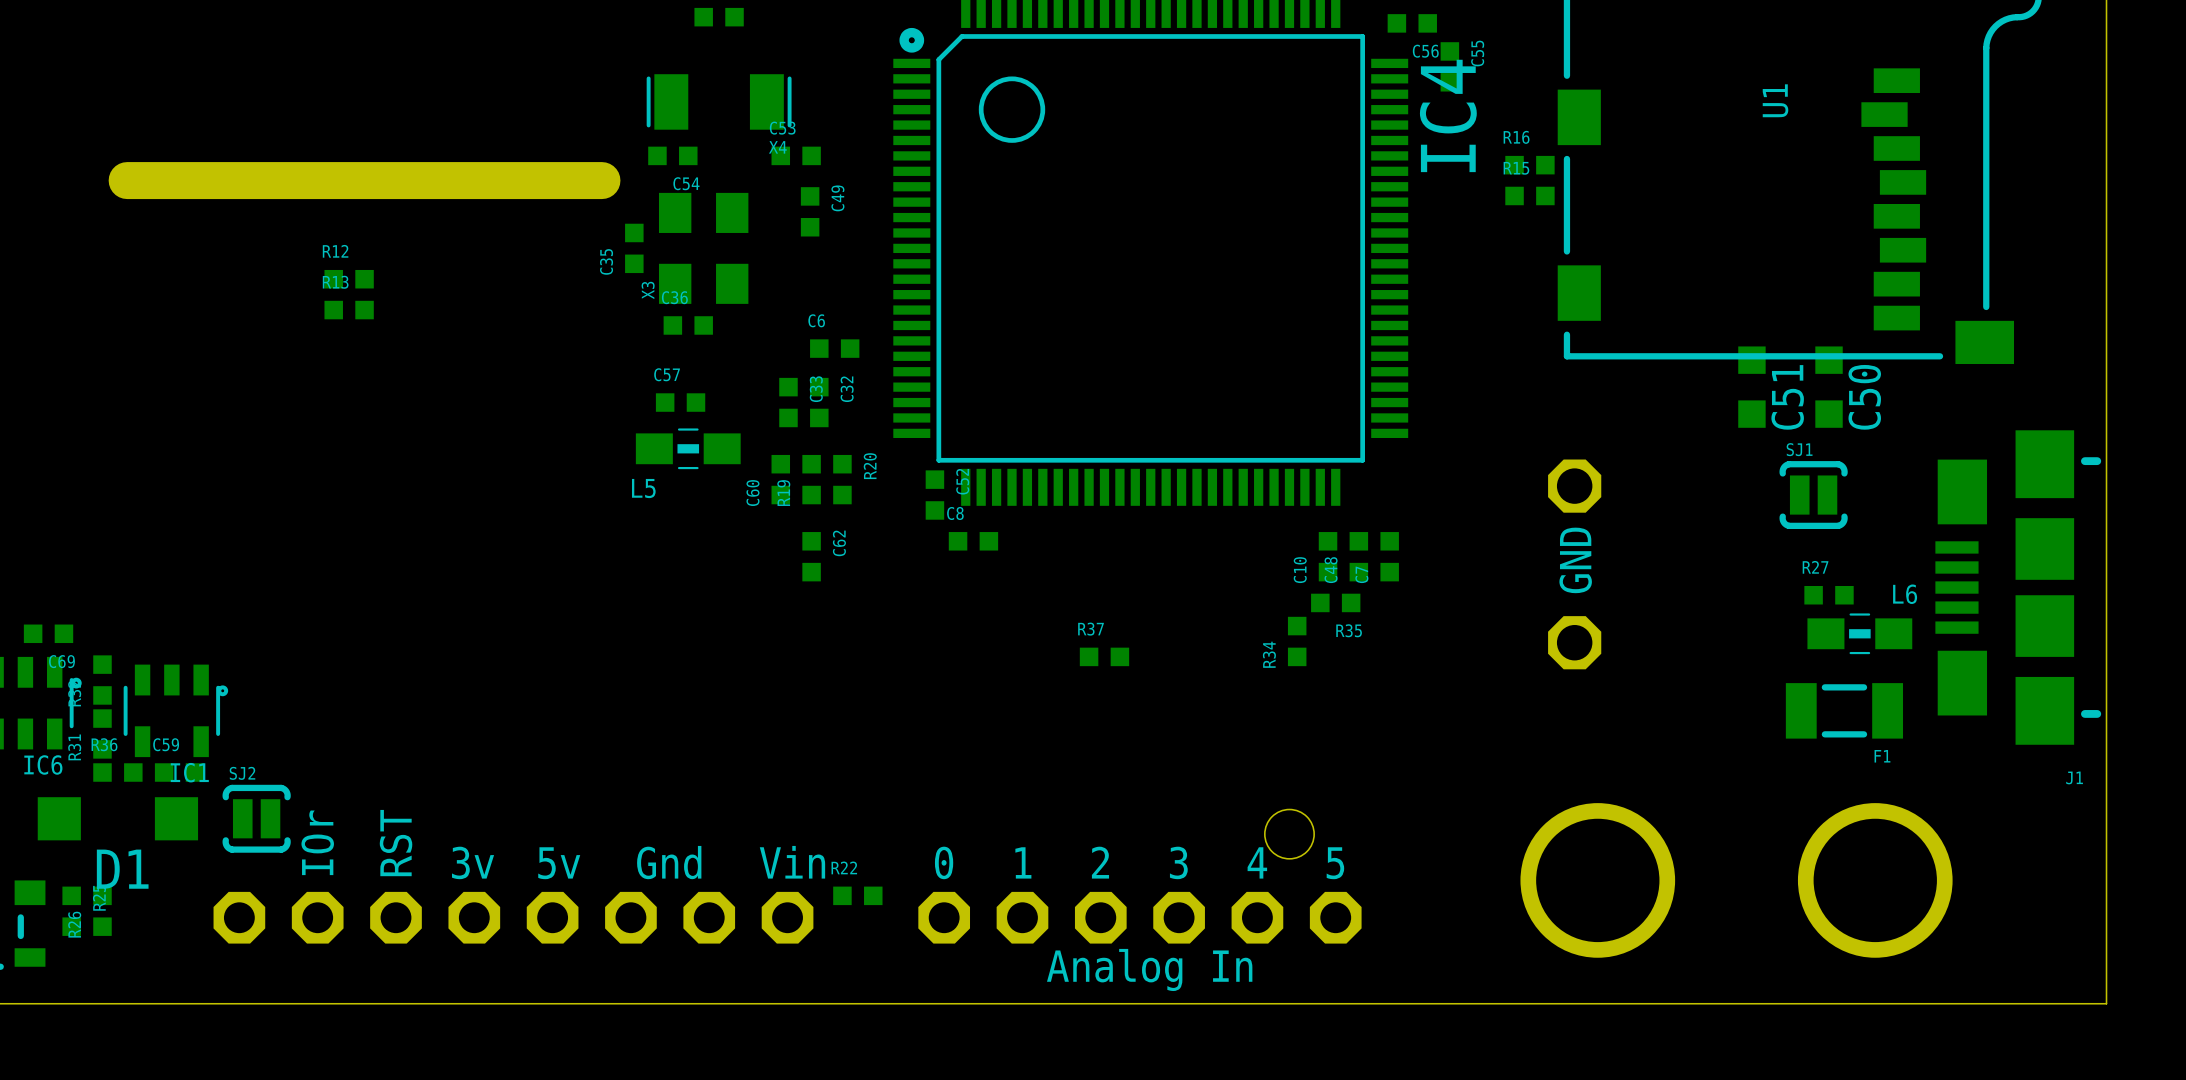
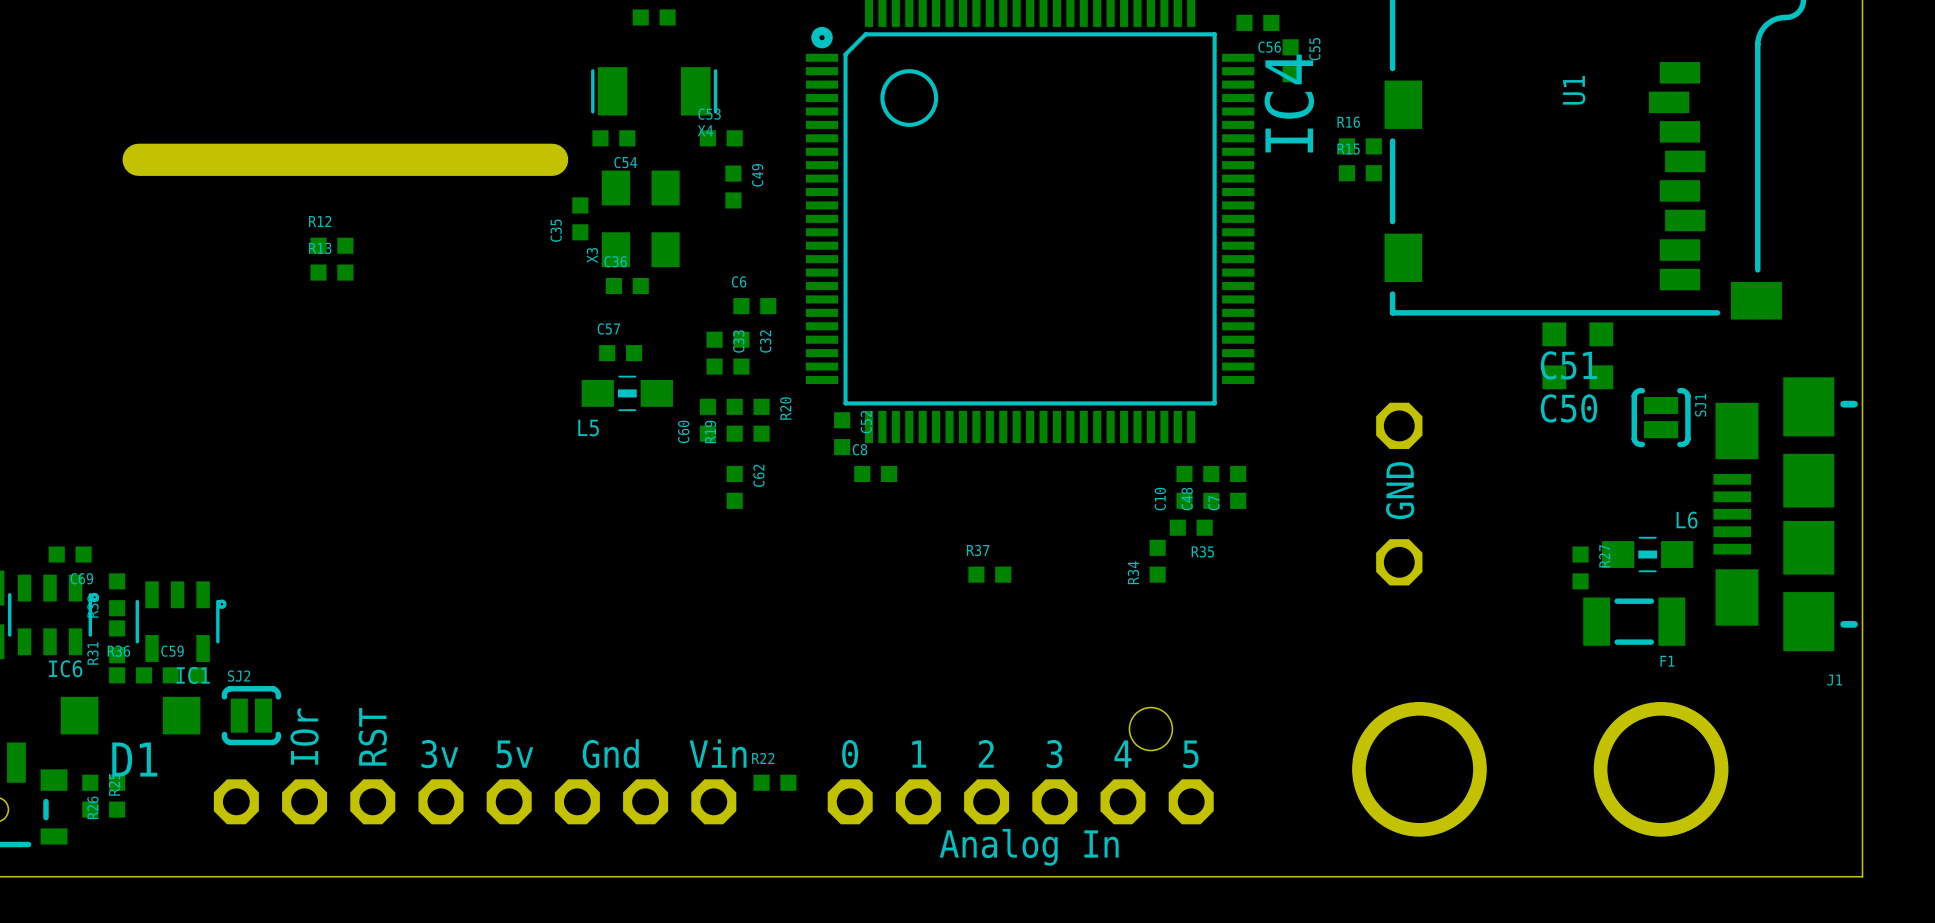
C51 rotation: 0° (1751, 387) -> 90° clockwise (1577, 334)
C50 rotation: 0° (1829, 387) -> 90° clockwise (1577, 377)
C50 position: (1829, 387) -> (1577, 377)
SJ1 rotation: 0° (1813, 495) -> 90° clockwise (1661, 417)
SJ1 position: (1813, 495) -> (1661, 417)
R27 rotation: 0° (1829, 595) -> 90° clockwise (1580, 567)
R27 position: (1829, 595) -> (1580, 567)

